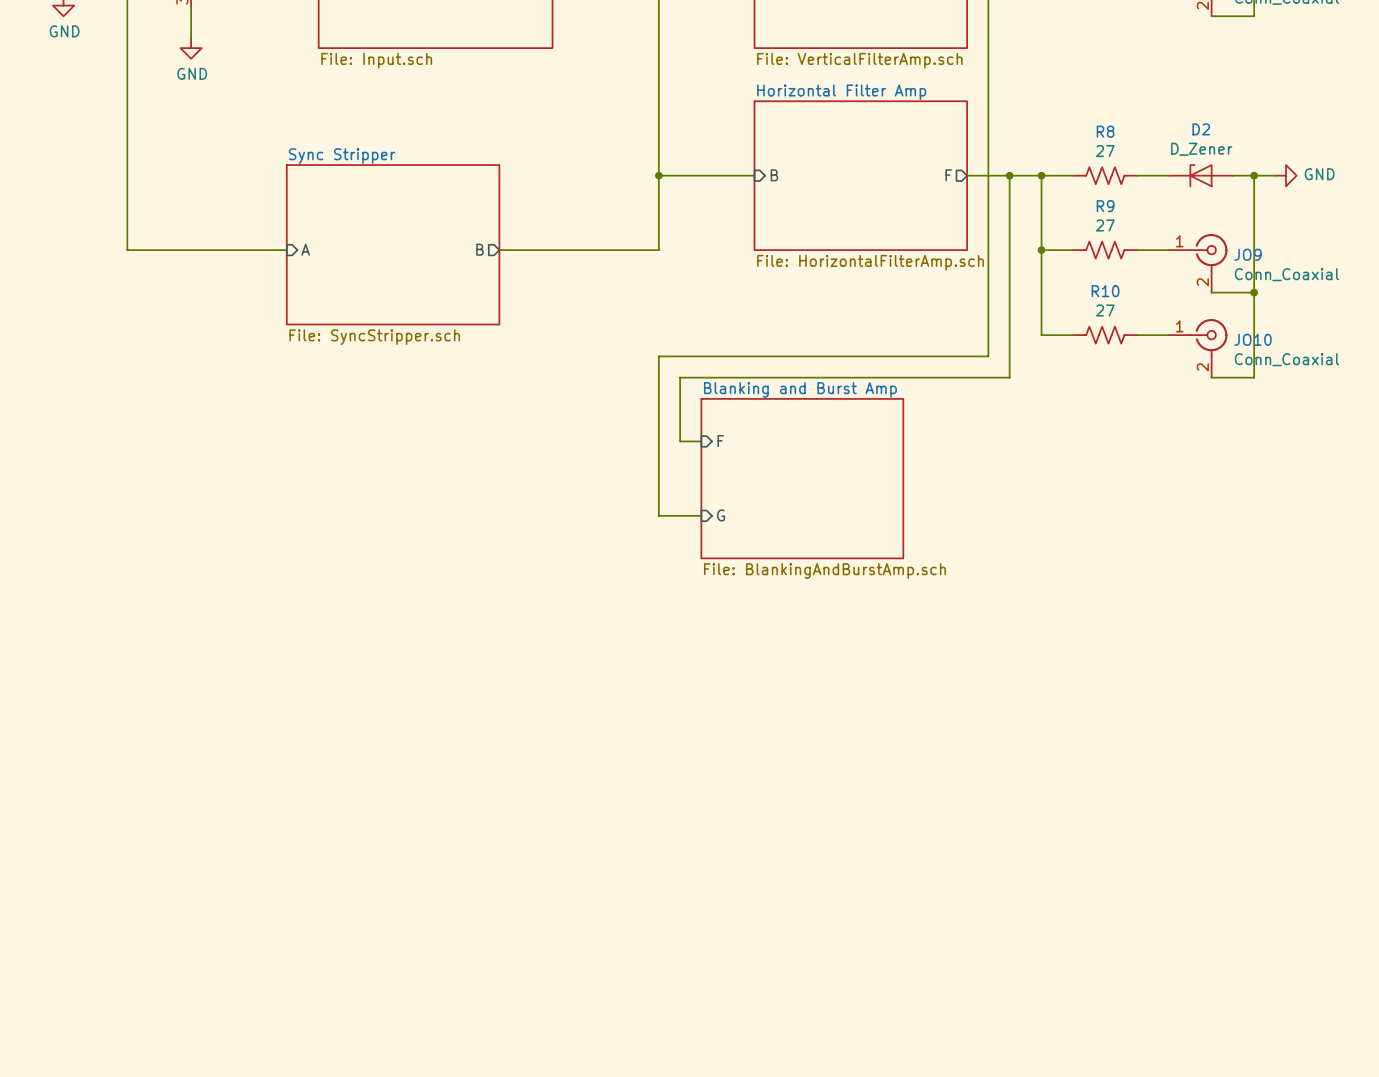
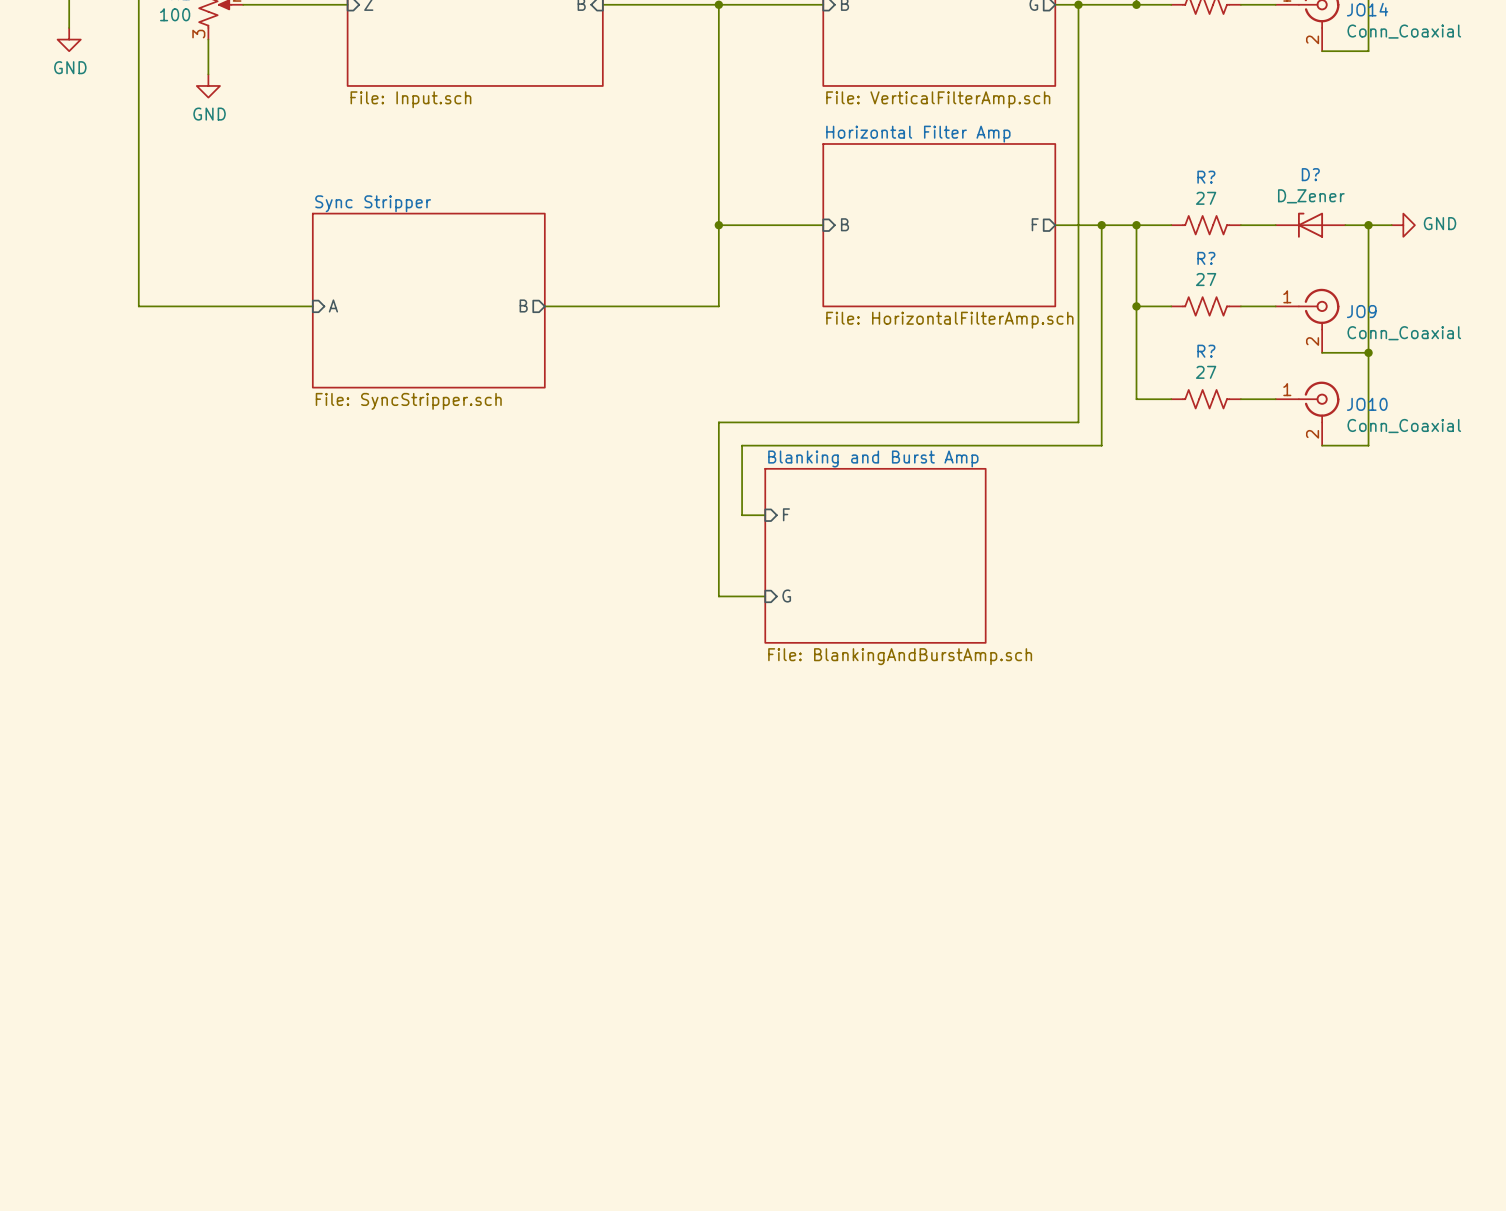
D2 name: D2 (1201, 129) -> D? (1310, 174)
R8 name: R8 (1105, 131) -> R? (1206, 177)
R9 name: R9 (1105, 206) -> R? (1206, 258)
R10 name: R10 (1105, 291) -> R? (1206, 351)

